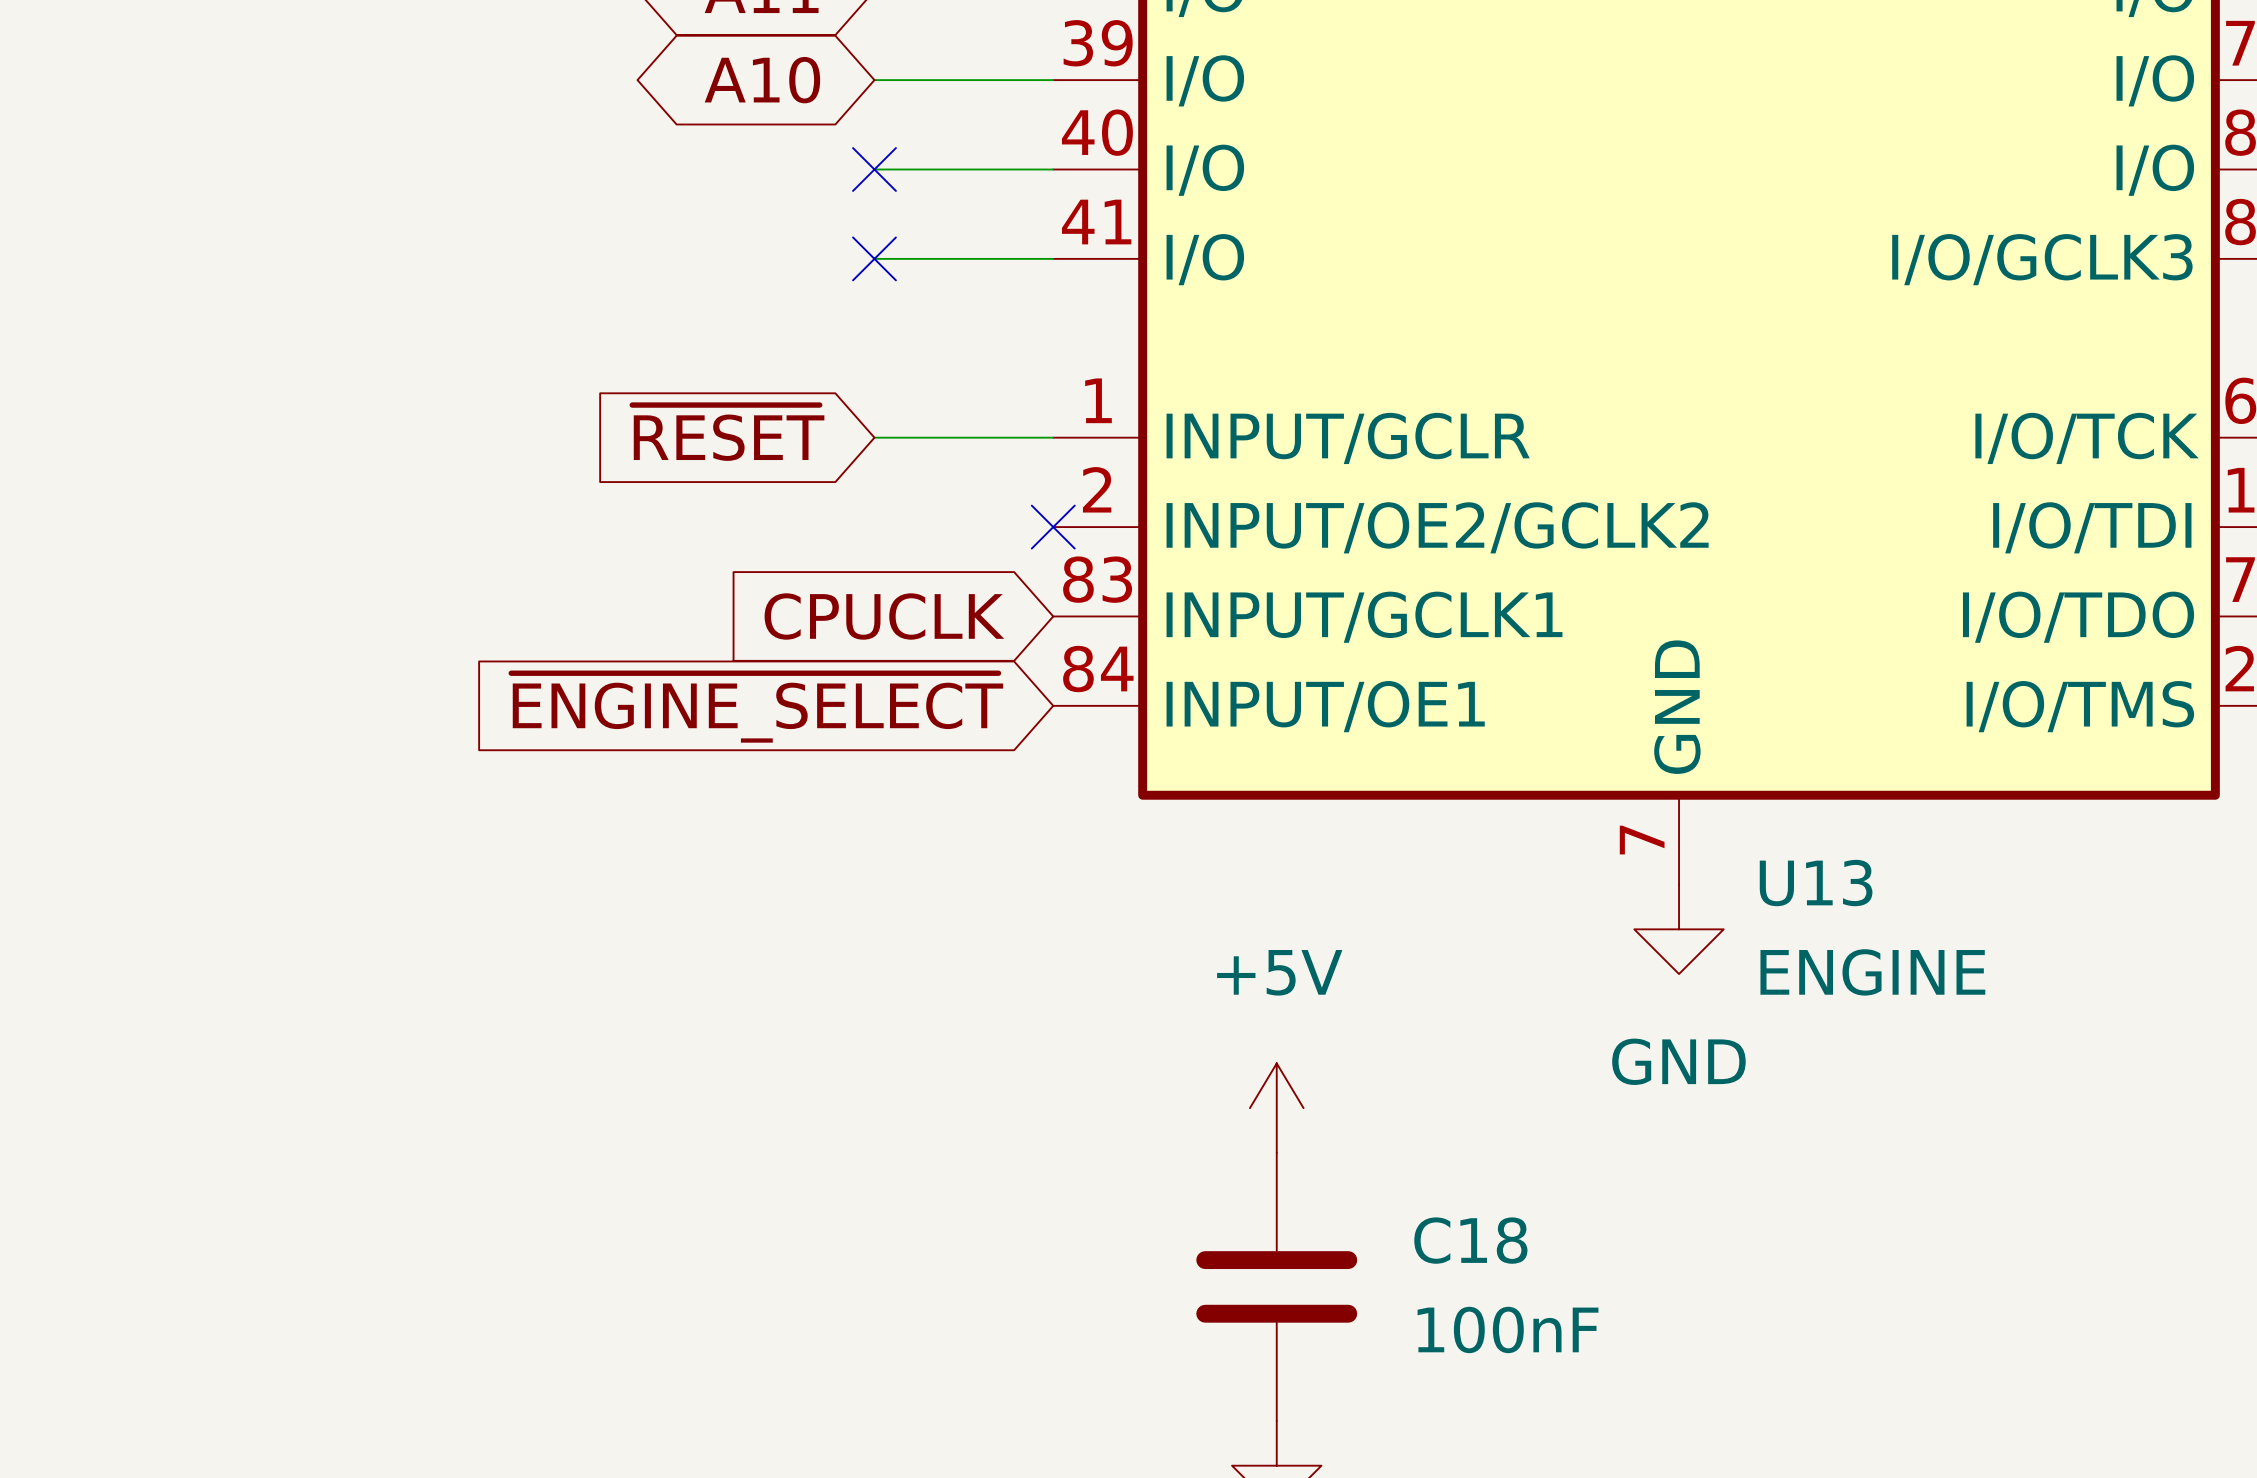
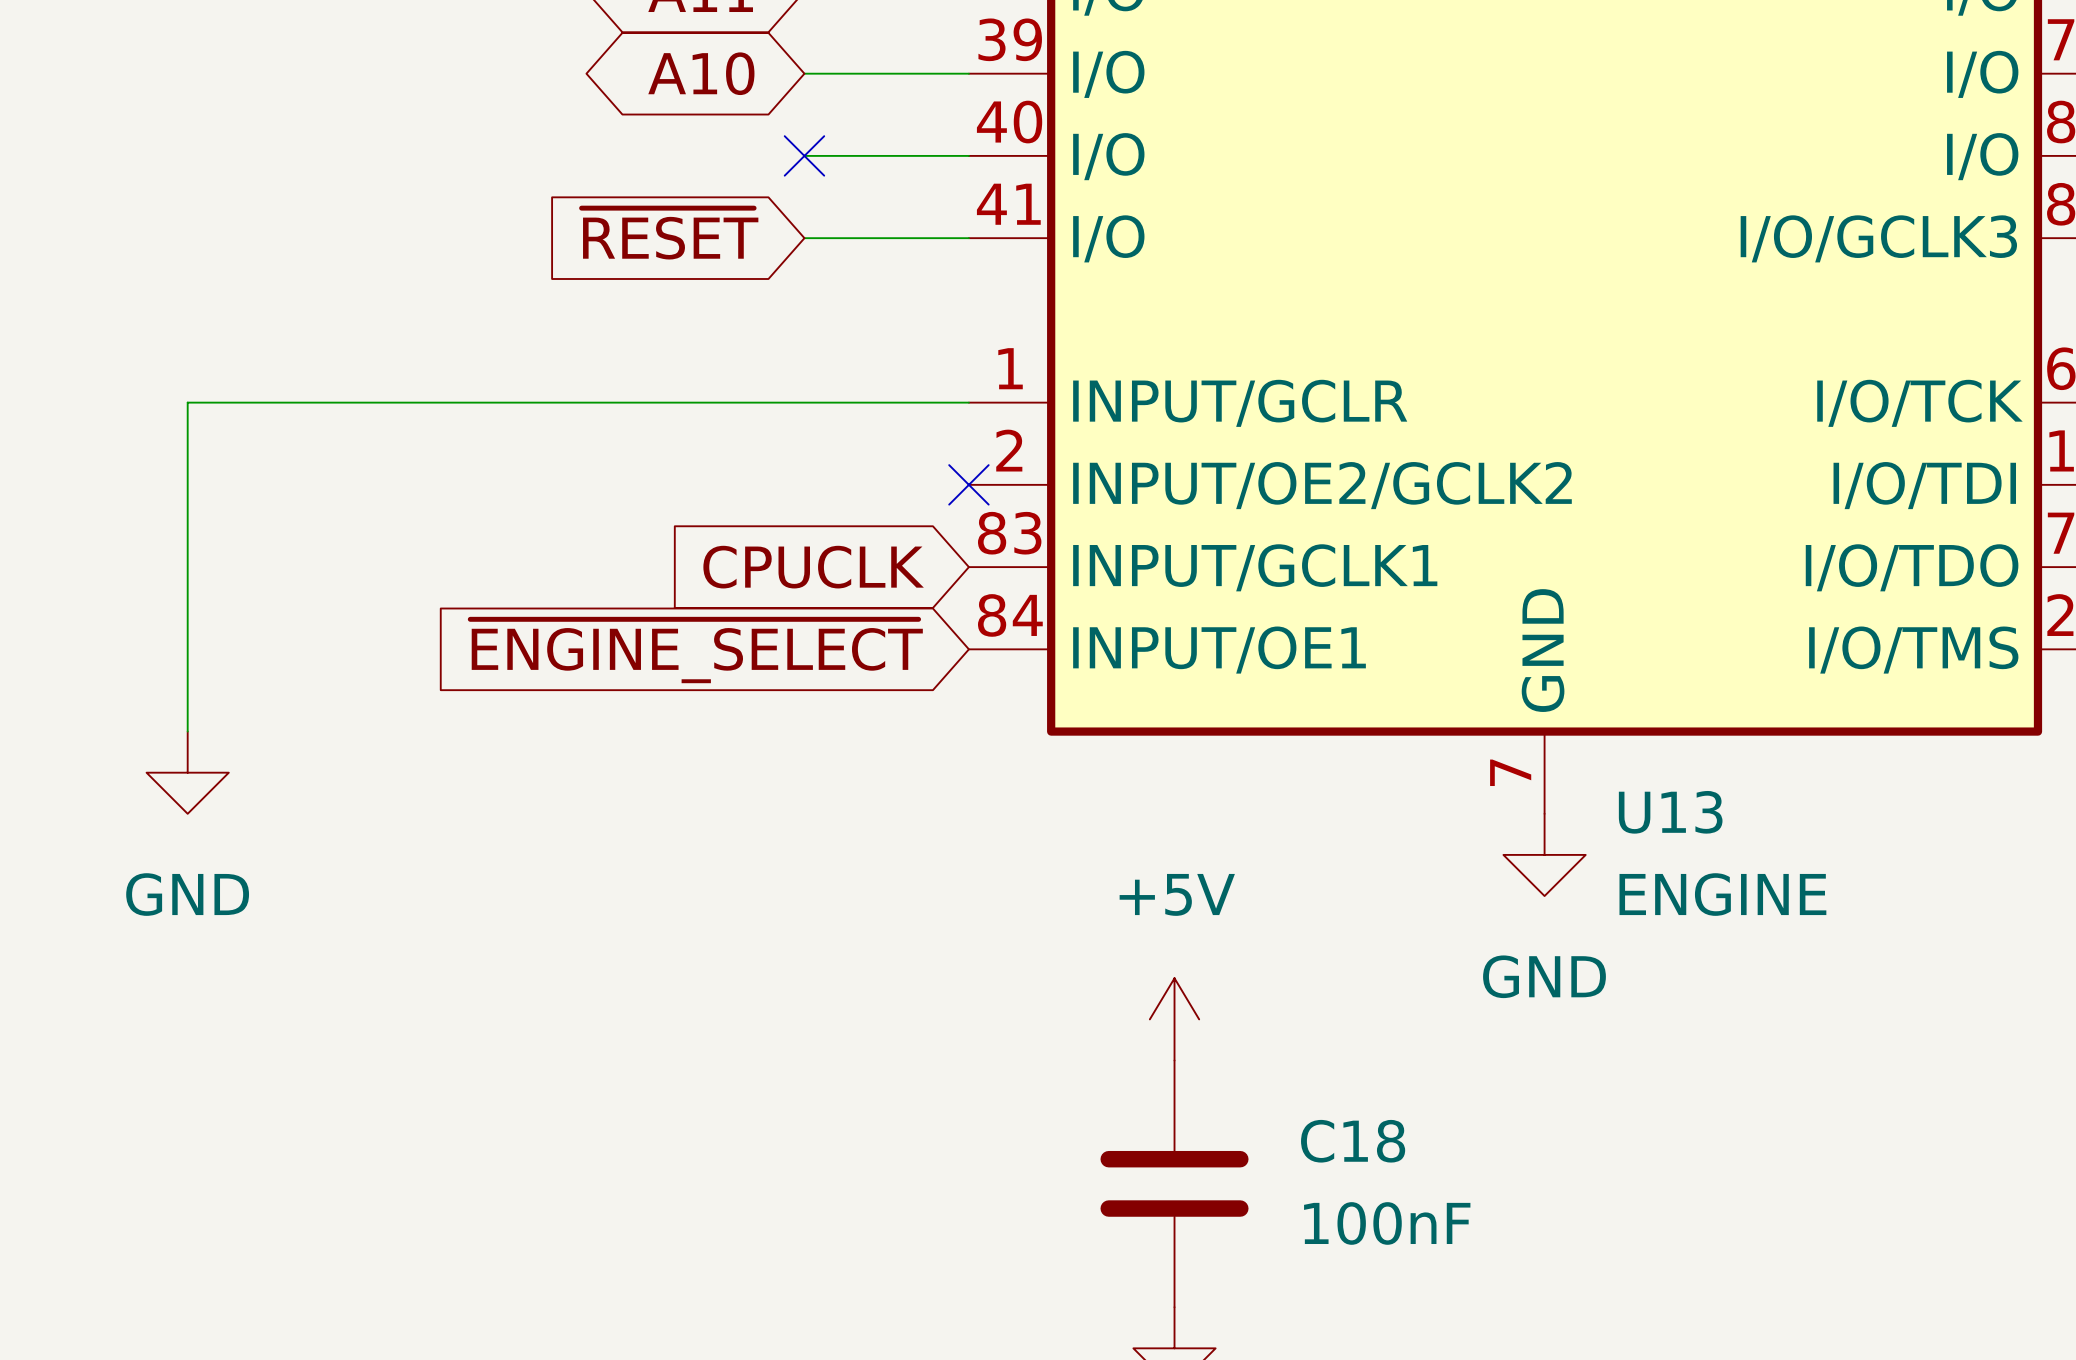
no-connect mark: (874, 258) -> none
global label position: ~{RESET} (728, 432) -> ~{RESET} (669, 233)
wire: none -> (804, 402) (187, 402) (187, 731)
power symbol: none -> GND (187, 772)

